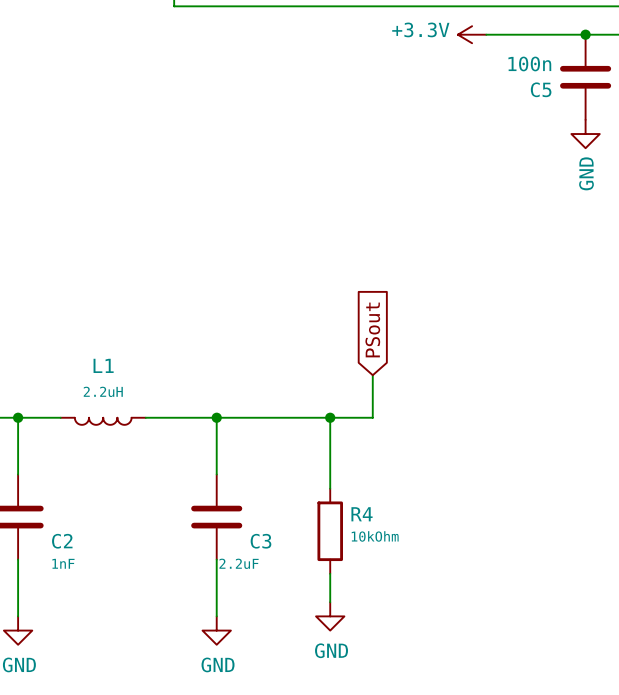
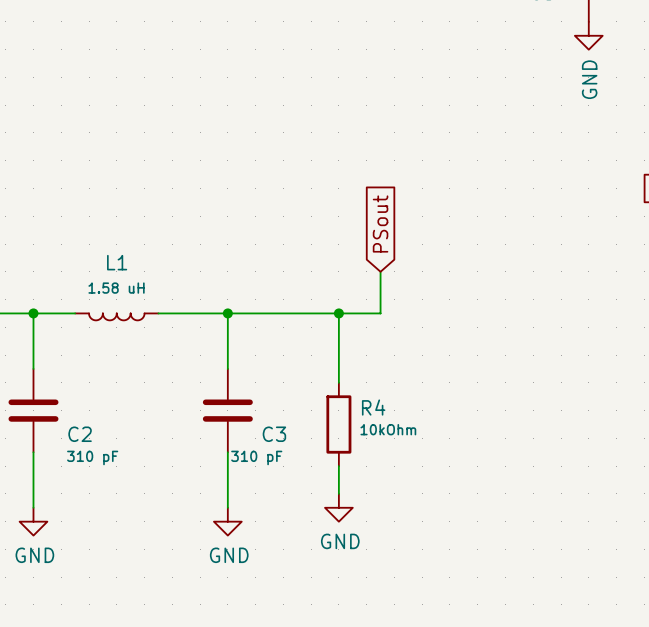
L1 value: 2.2uH (103, 391) -> 1.58 uH (116, 288)
C2 value: 1nF (63, 563) -> 310 pF (92, 457)
C3 value: 2.2uF (239, 563) -> 310 pF (256, 457)

